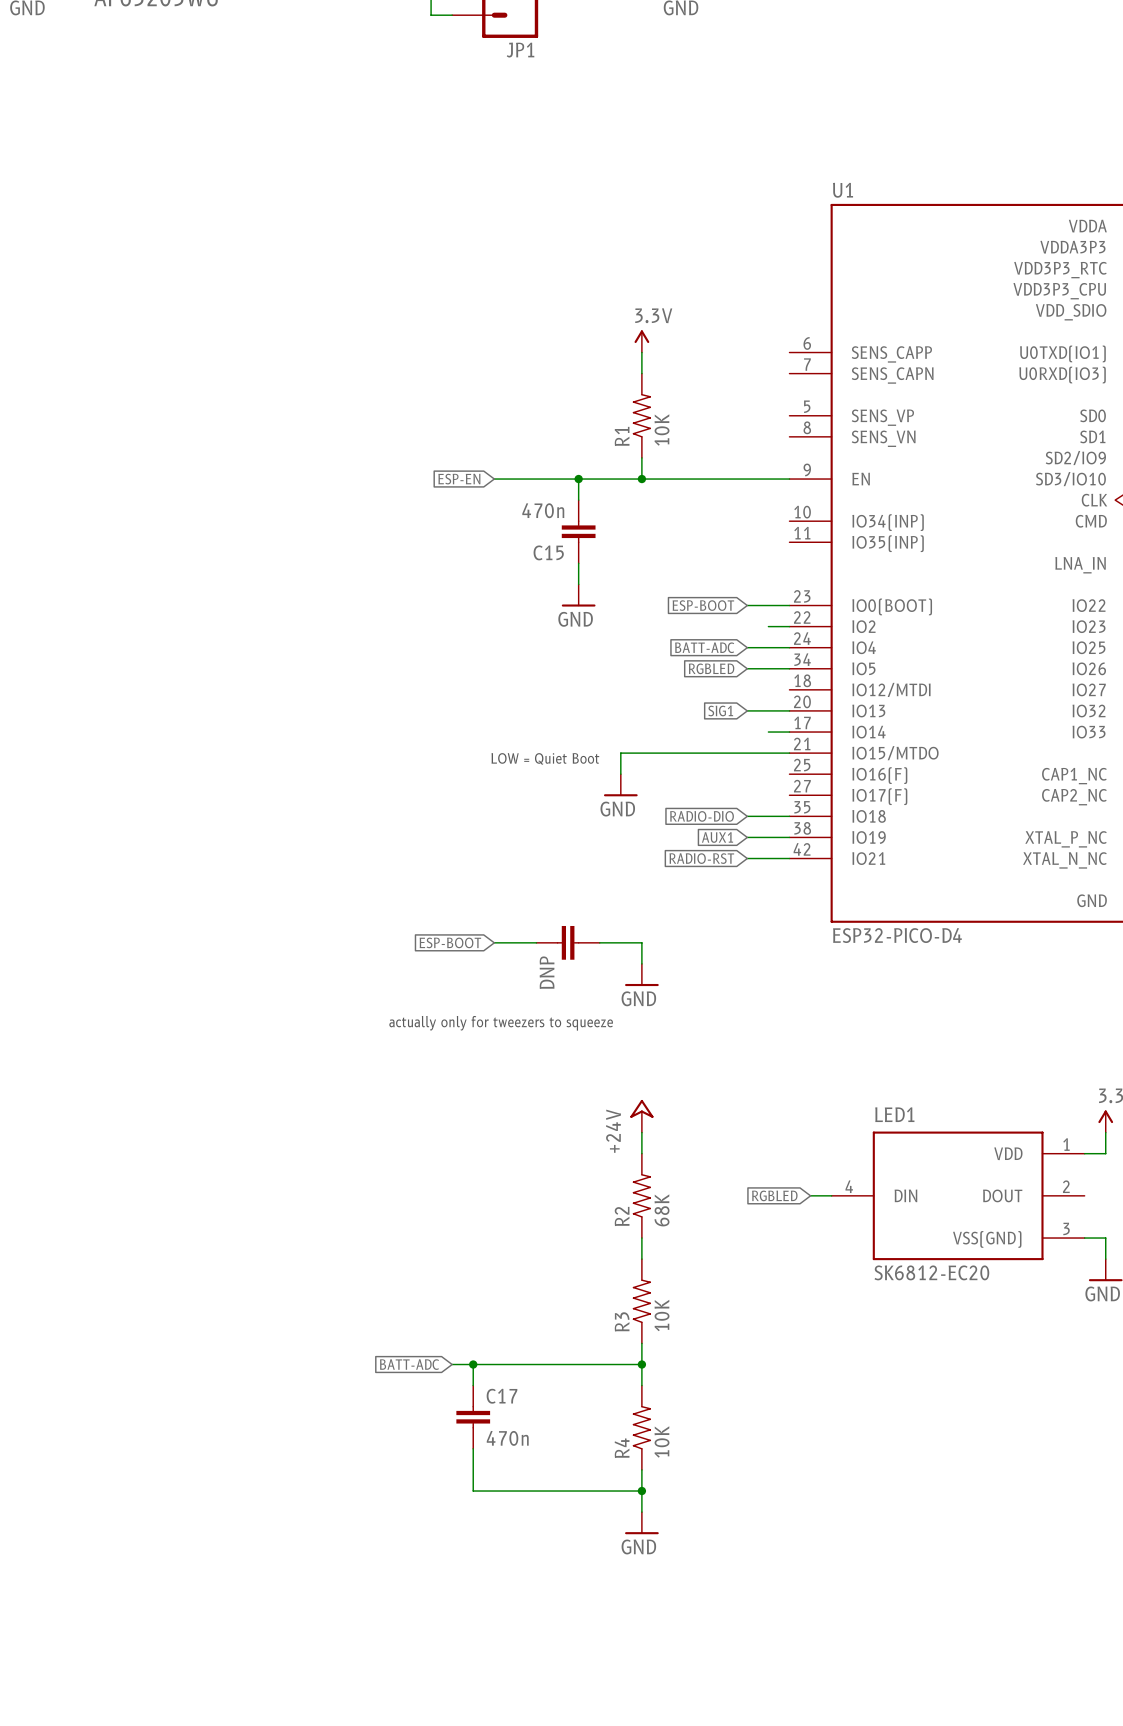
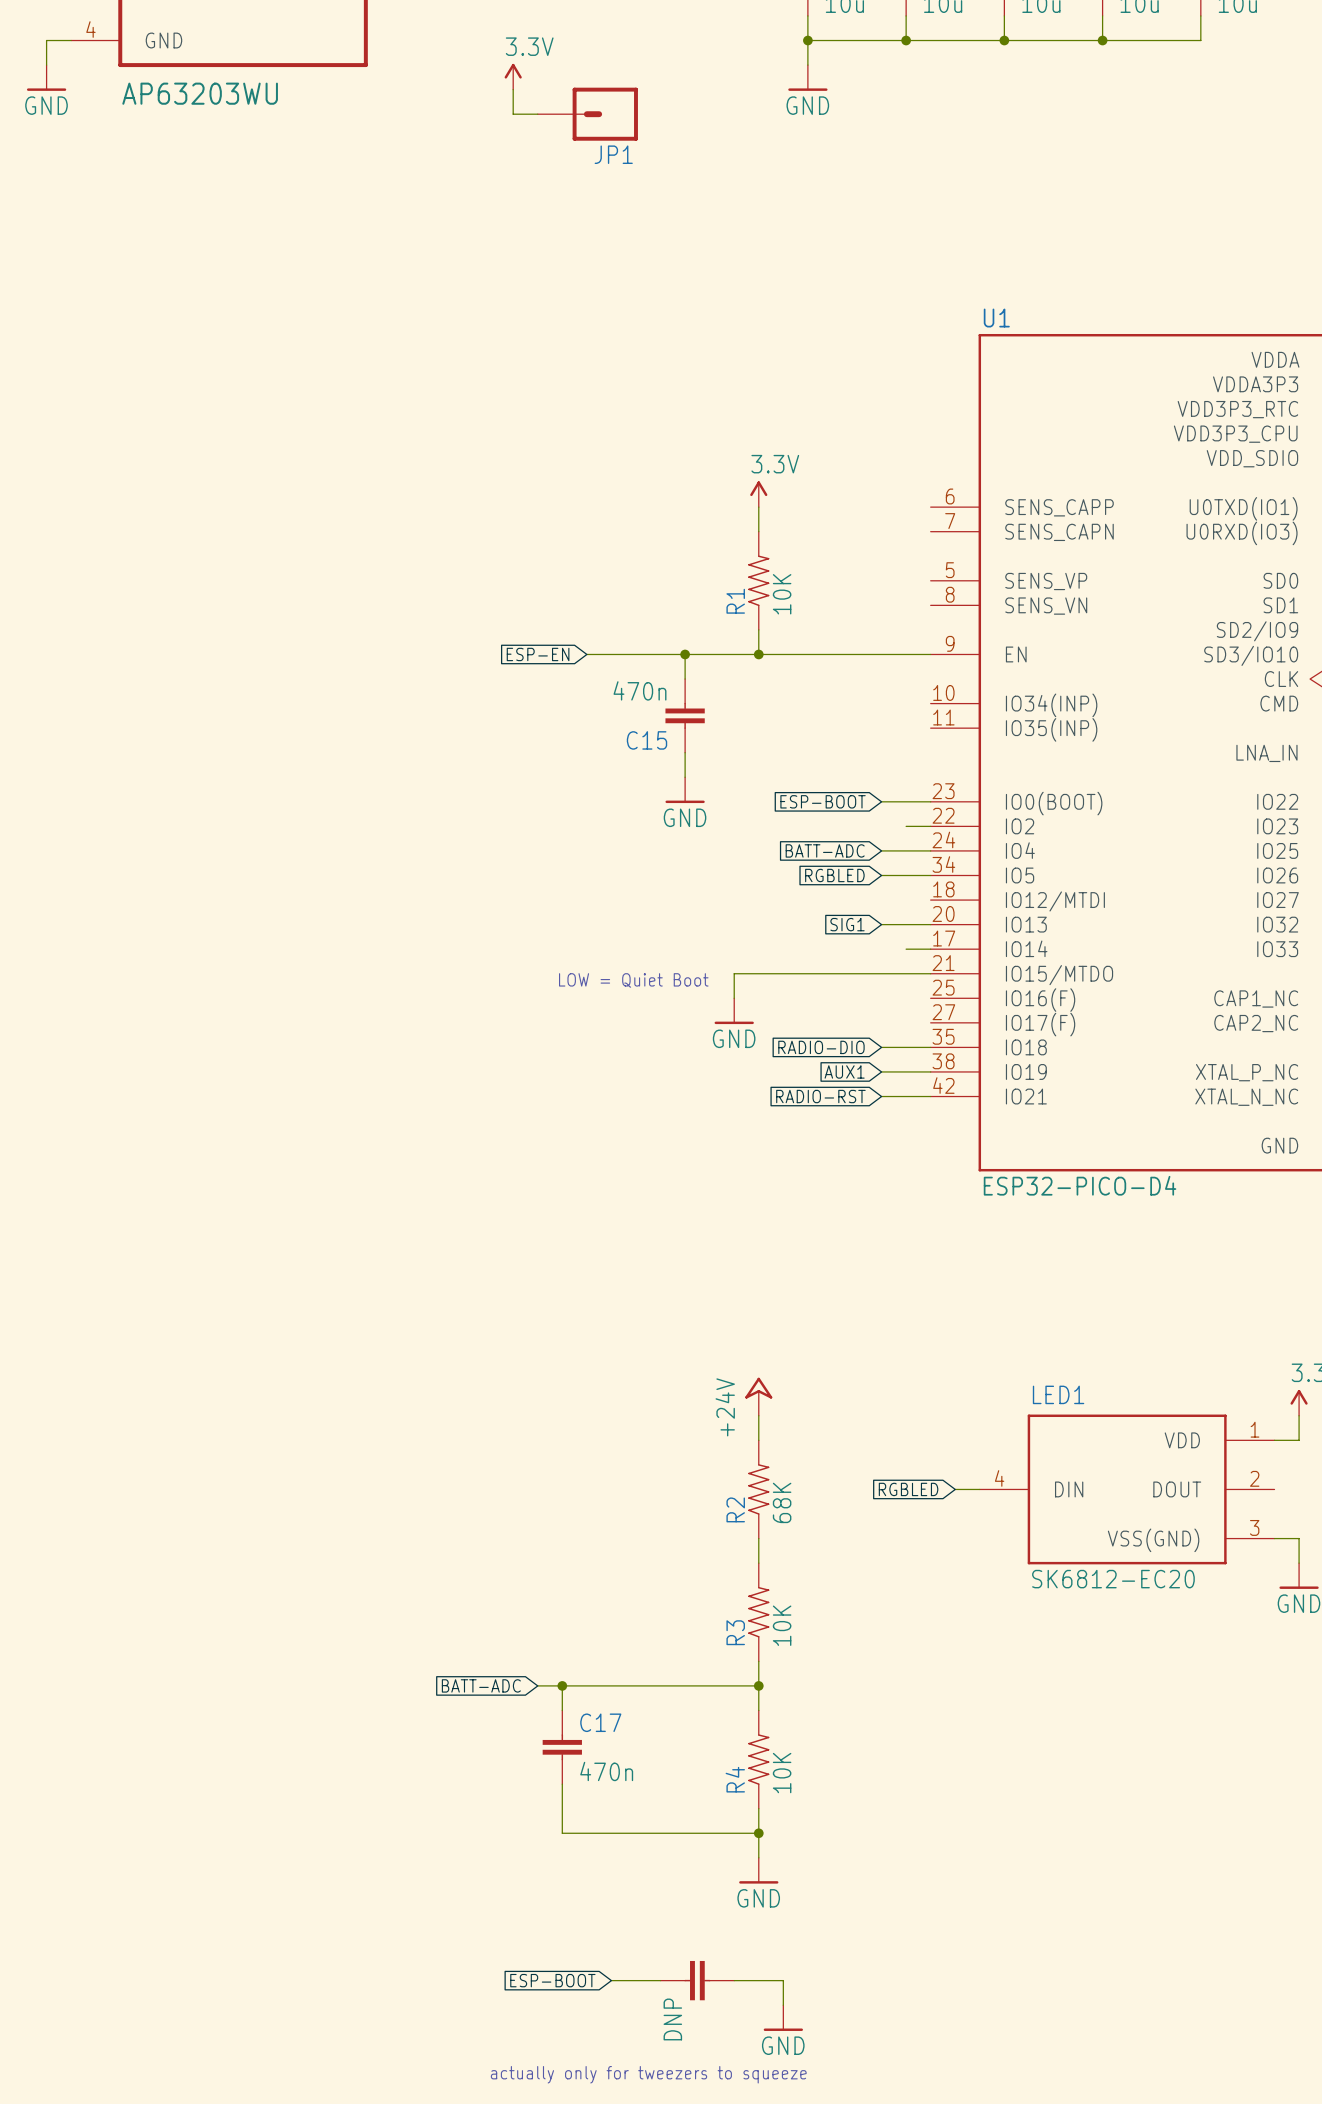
global label: ESP-BOOT (450, 942) -> none
wire: (494, 942) (536, 942) -> none
part: DNP (568, 942) -> none
wire: (599, 942) (641, 942) (641, 963) -> none
power symbol: GND (641, 975) -> none
text: actually only for tweezers to squeeze (501, 1023) -> none
global label: none -> ESP-BOOT (552, 1980)
wire: none -> (611, 1980) (660, 1980)
part: none -> DNP (697, 1980)
wire: none -> (734, 1980) (783, 1980) (783, 2005)
power symbol: none -> GND (783, 2018)
text: none -> actually only for tweezers to squeeze (648, 2074)

